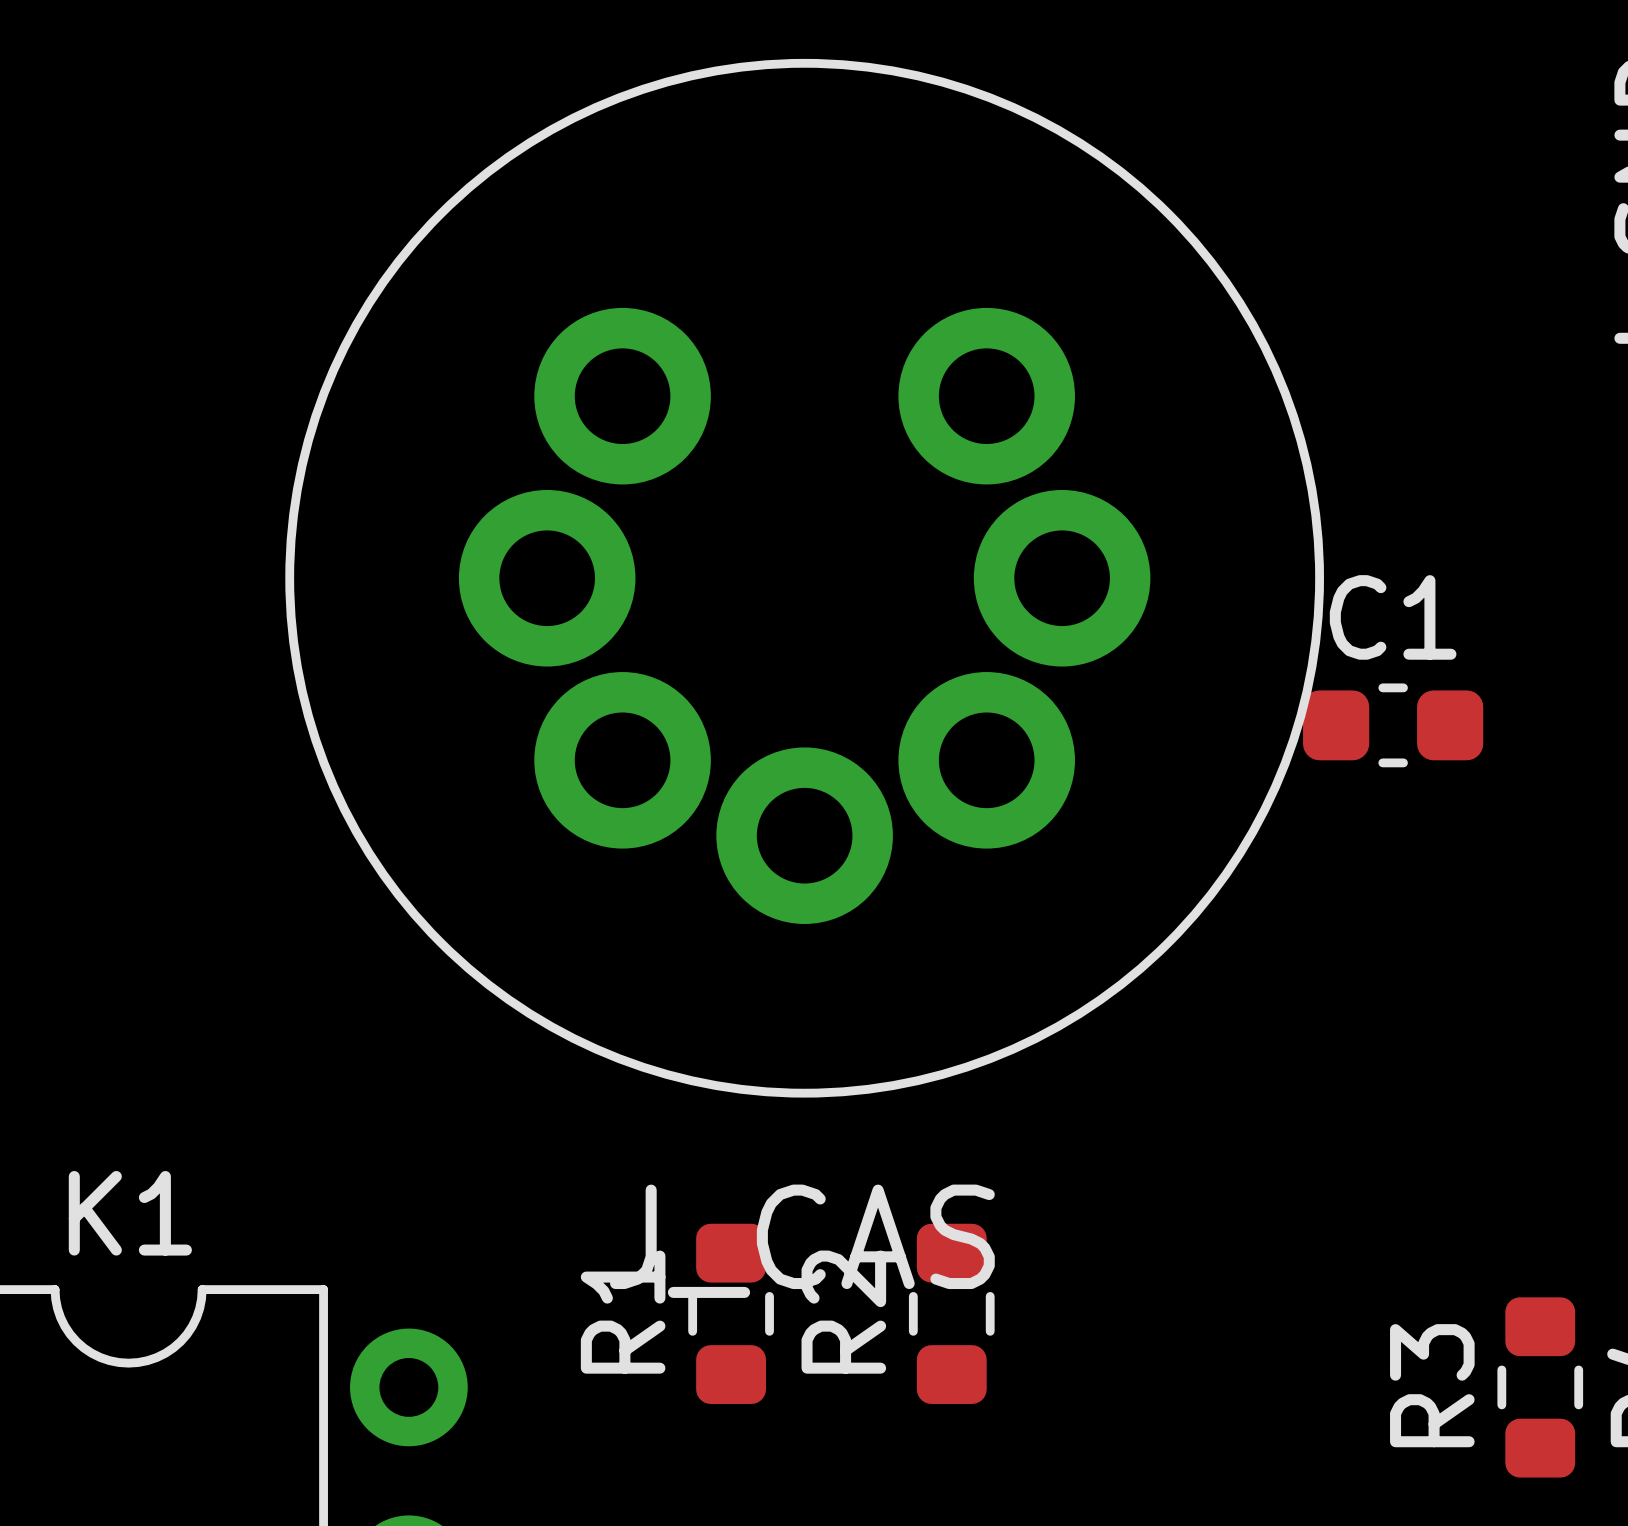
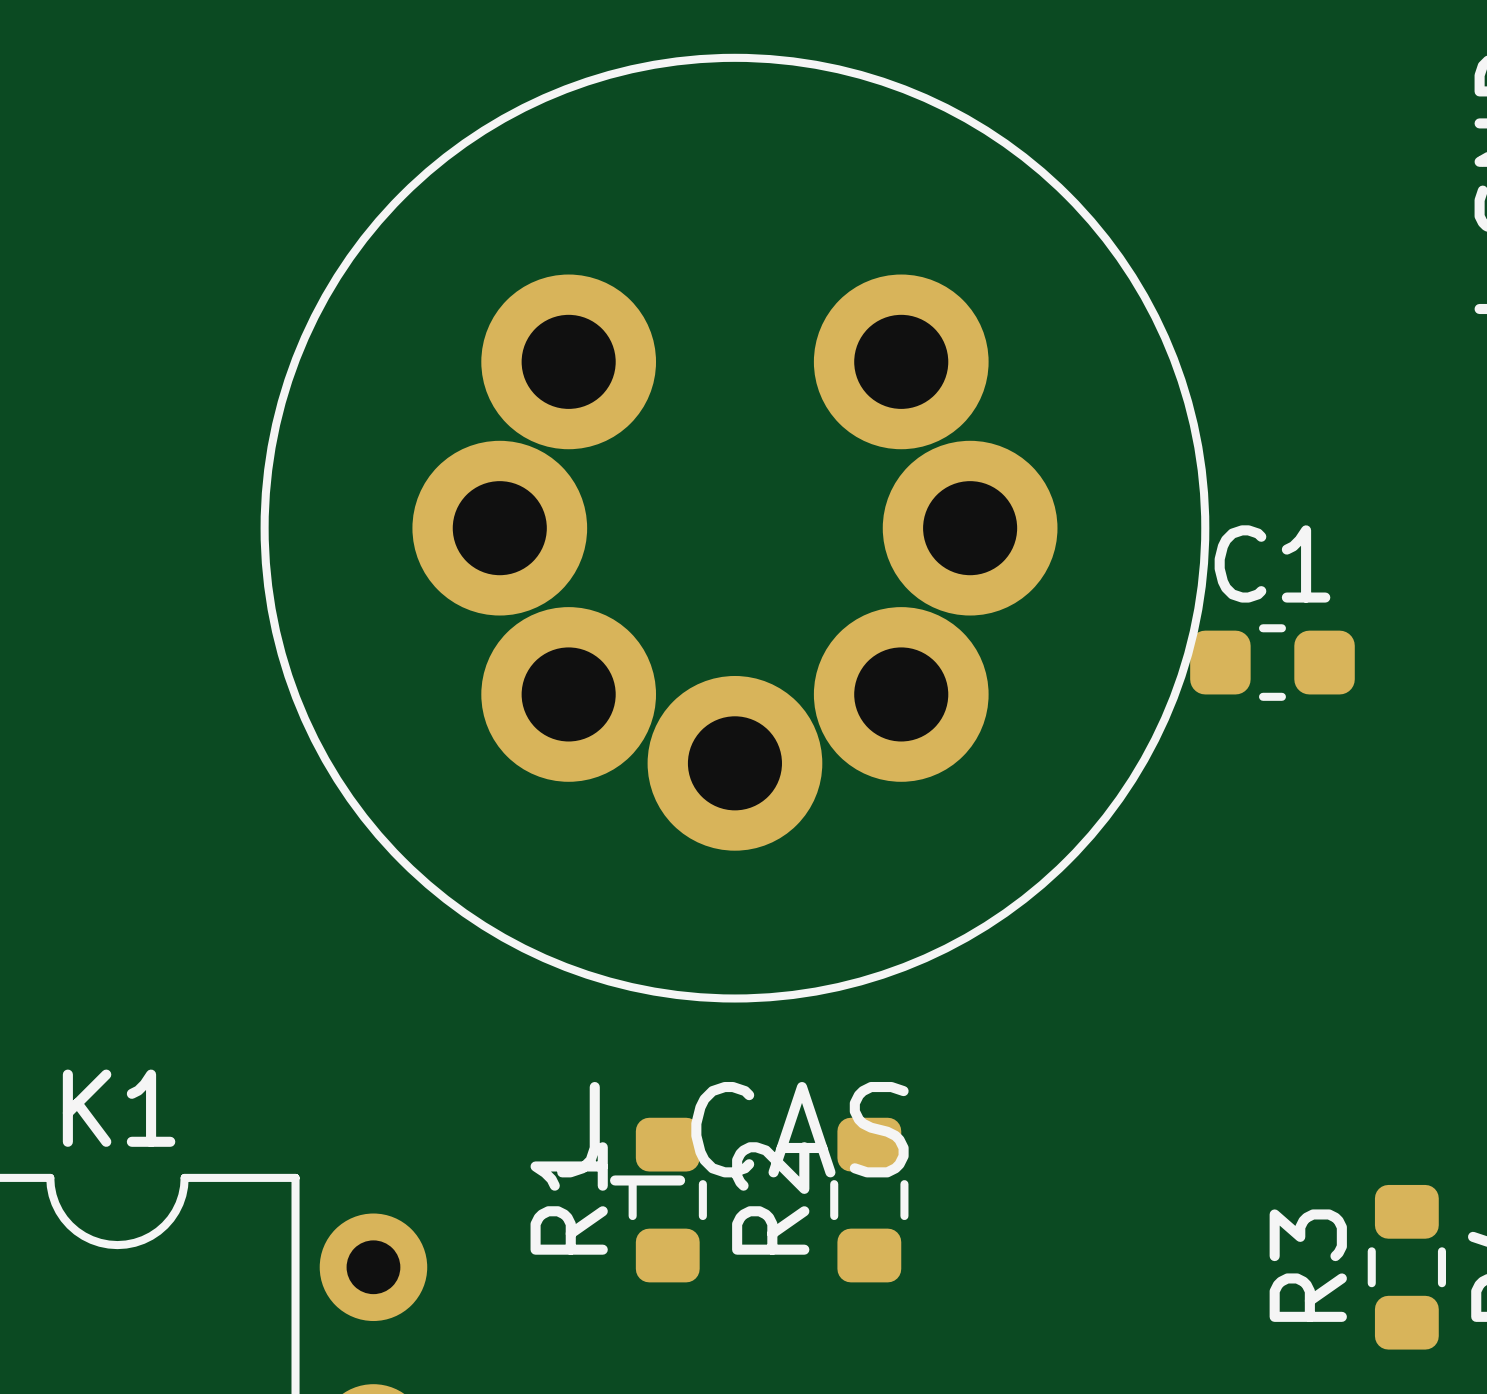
J_CAS footprint: [285, 58, 1324, 1098] -> [260, 53, 1210, 1003]

